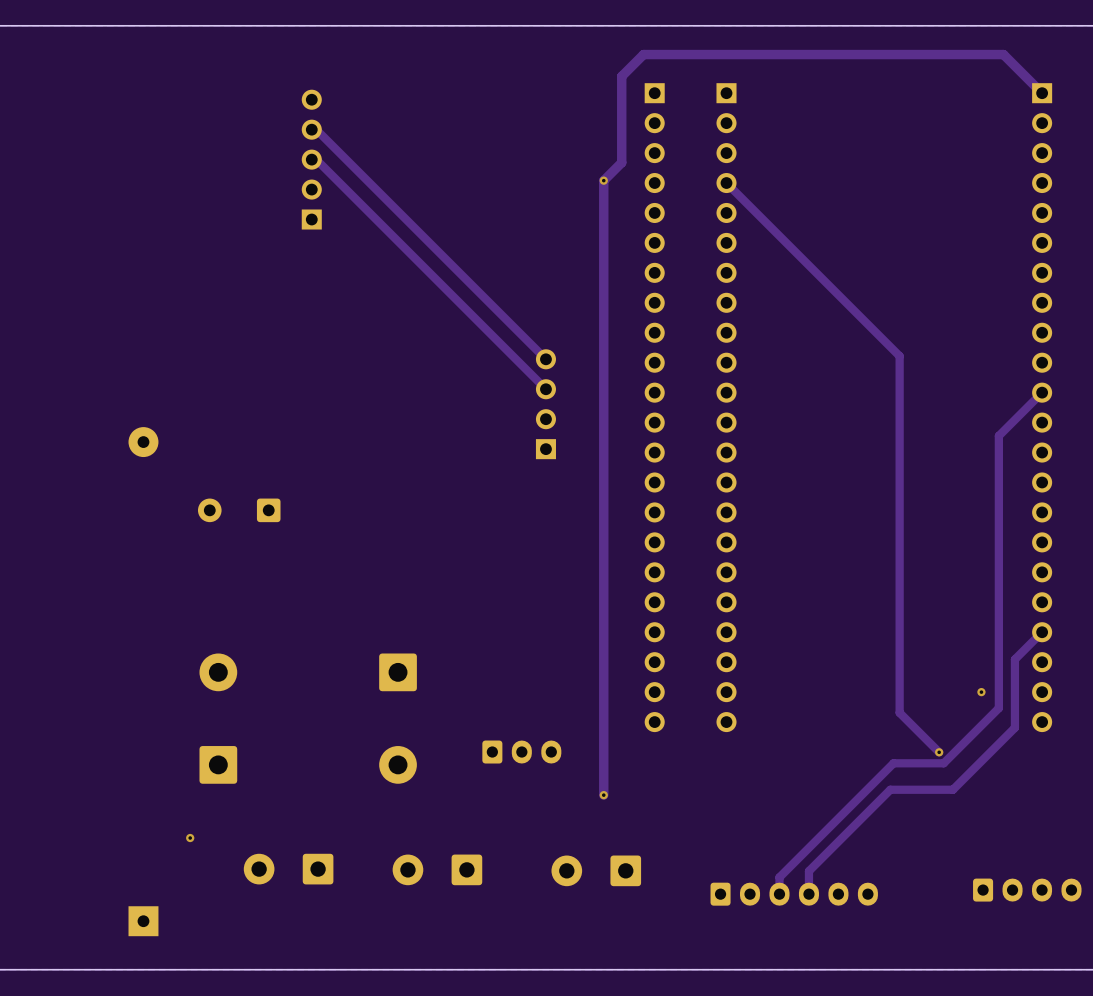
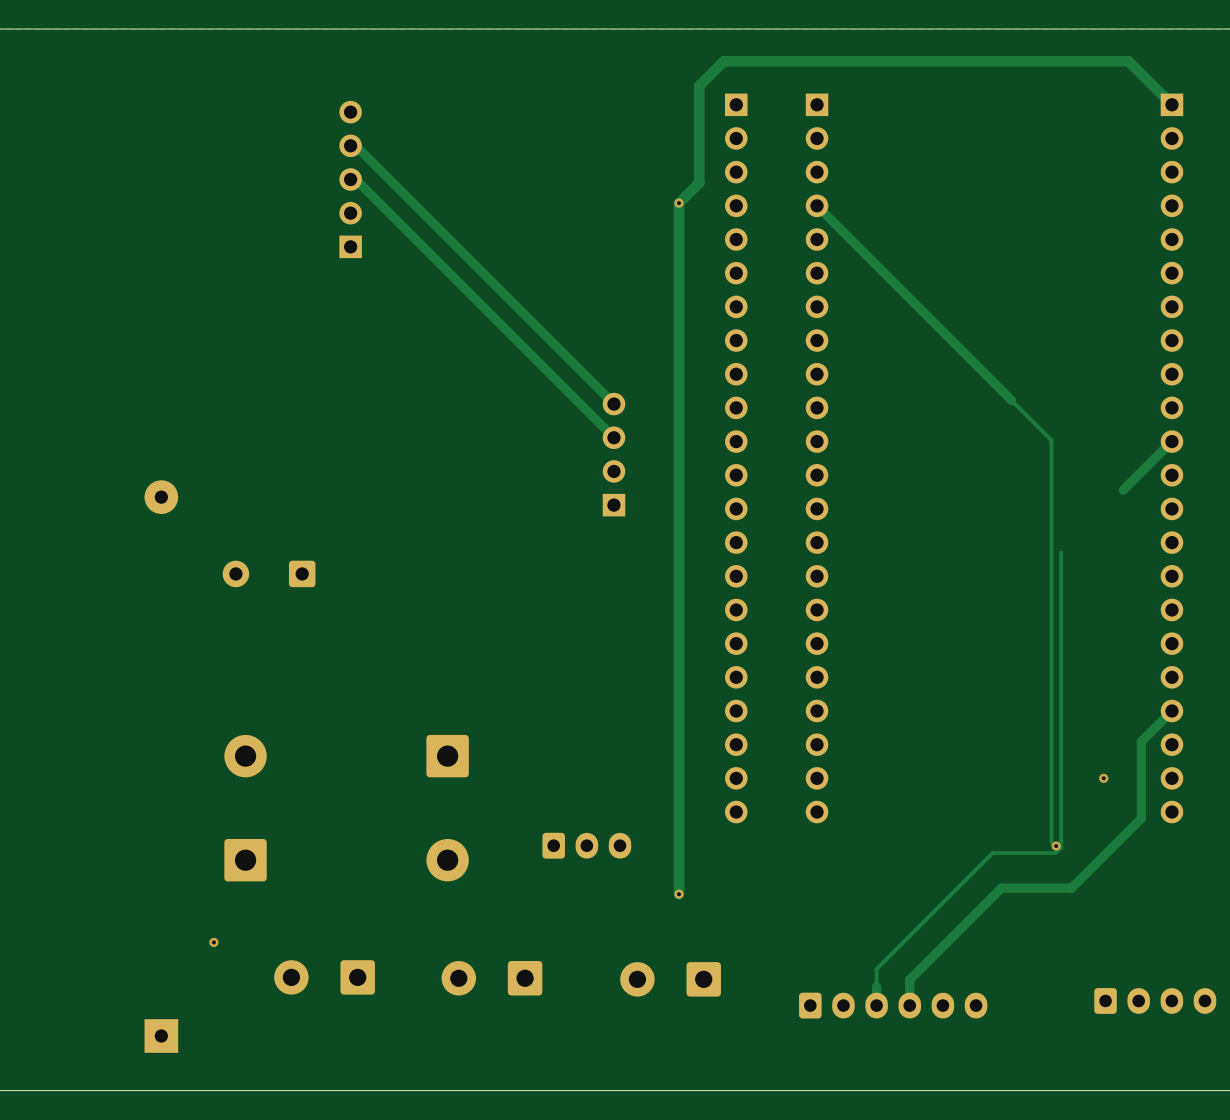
track: (899, 356) (899, 712) (939, 752) -> (1011, 400) (1051, 440) (1051, 843)
track: (998, 435) (998, 708) (943, 763) (893, 763) (779, 877) -> (1061, 552) (1061, 847) (1055, 853) (992, 853) (876, 969) (876, 986)

